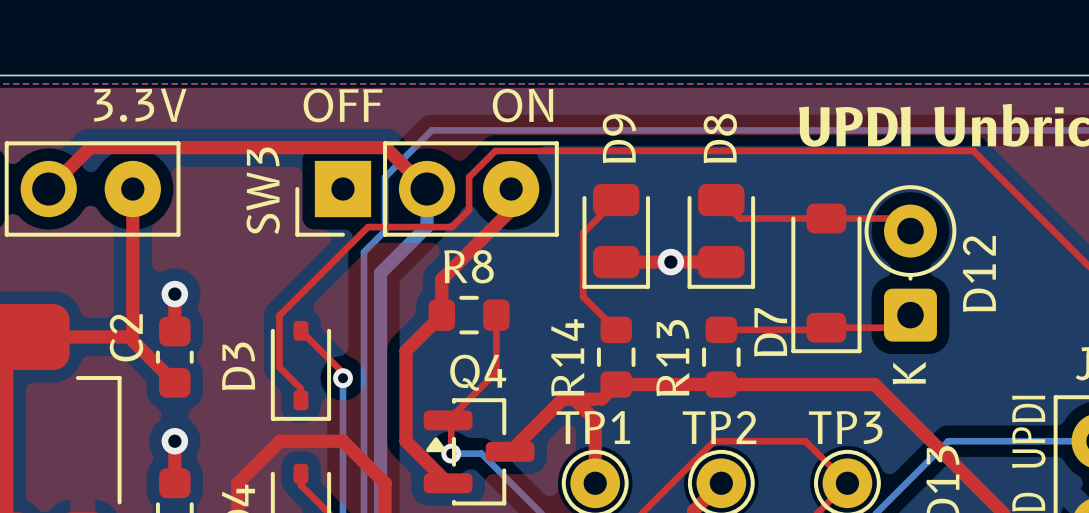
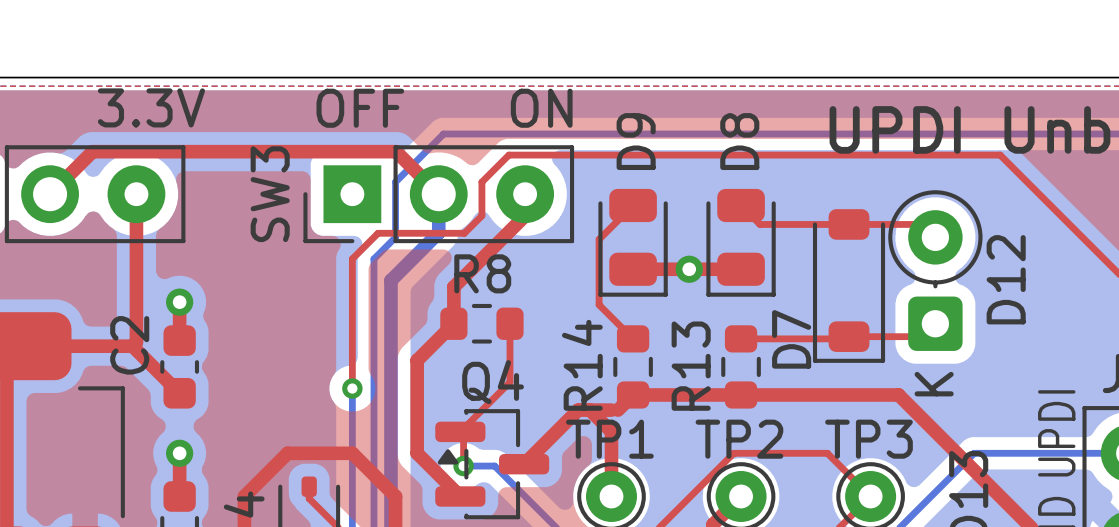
top track: (342, 252) (279, 315) (279, 367) (300, 388) -> (352, 258) (352, 383)
top track: (300, 330) (342, 372) -> none
D3: (300, 370) -> none

